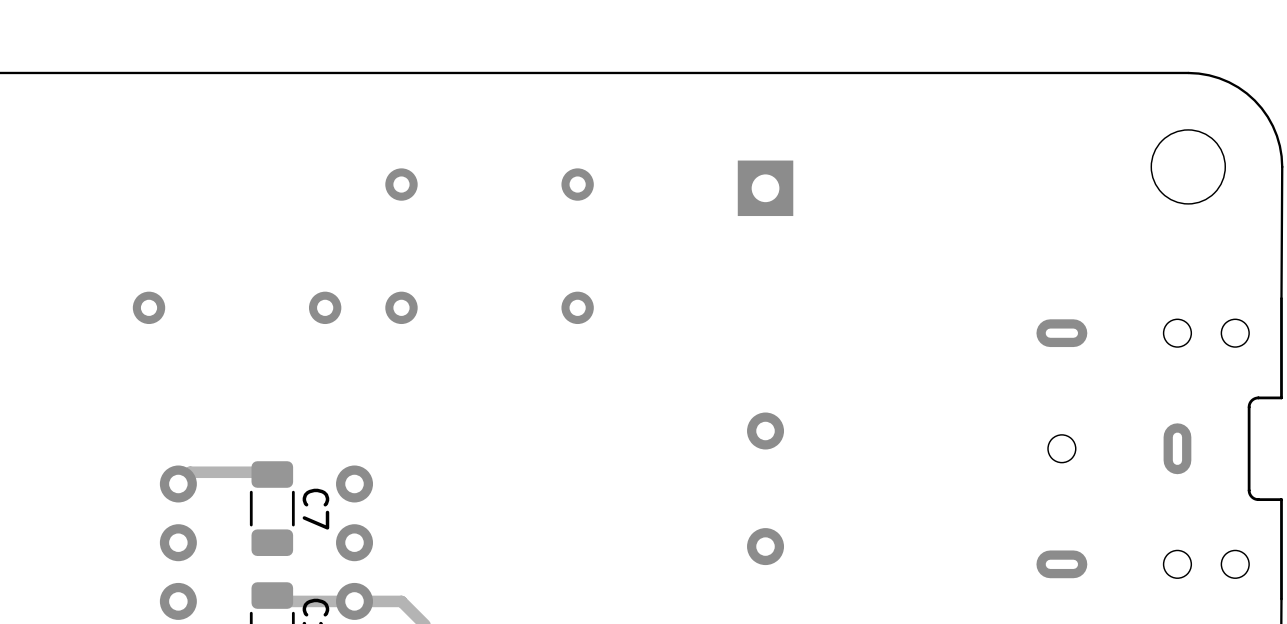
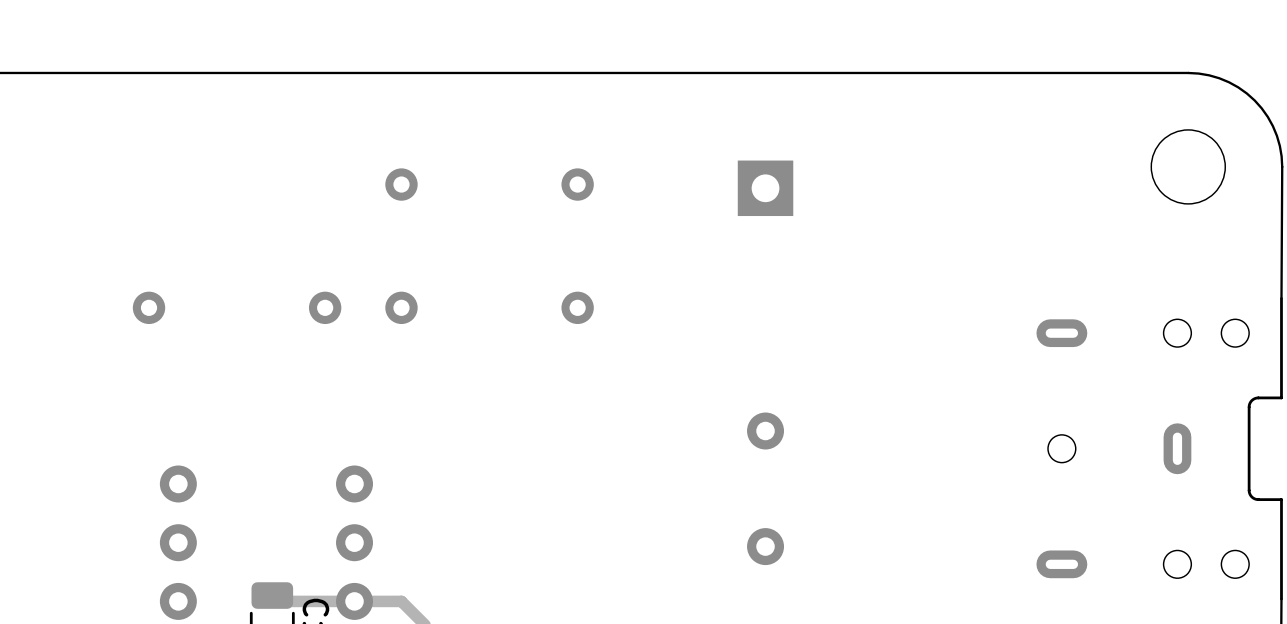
track: (272, 474) (270, 472) (190, 472) (178, 483) -> none
C7: (272, 508) -> none

